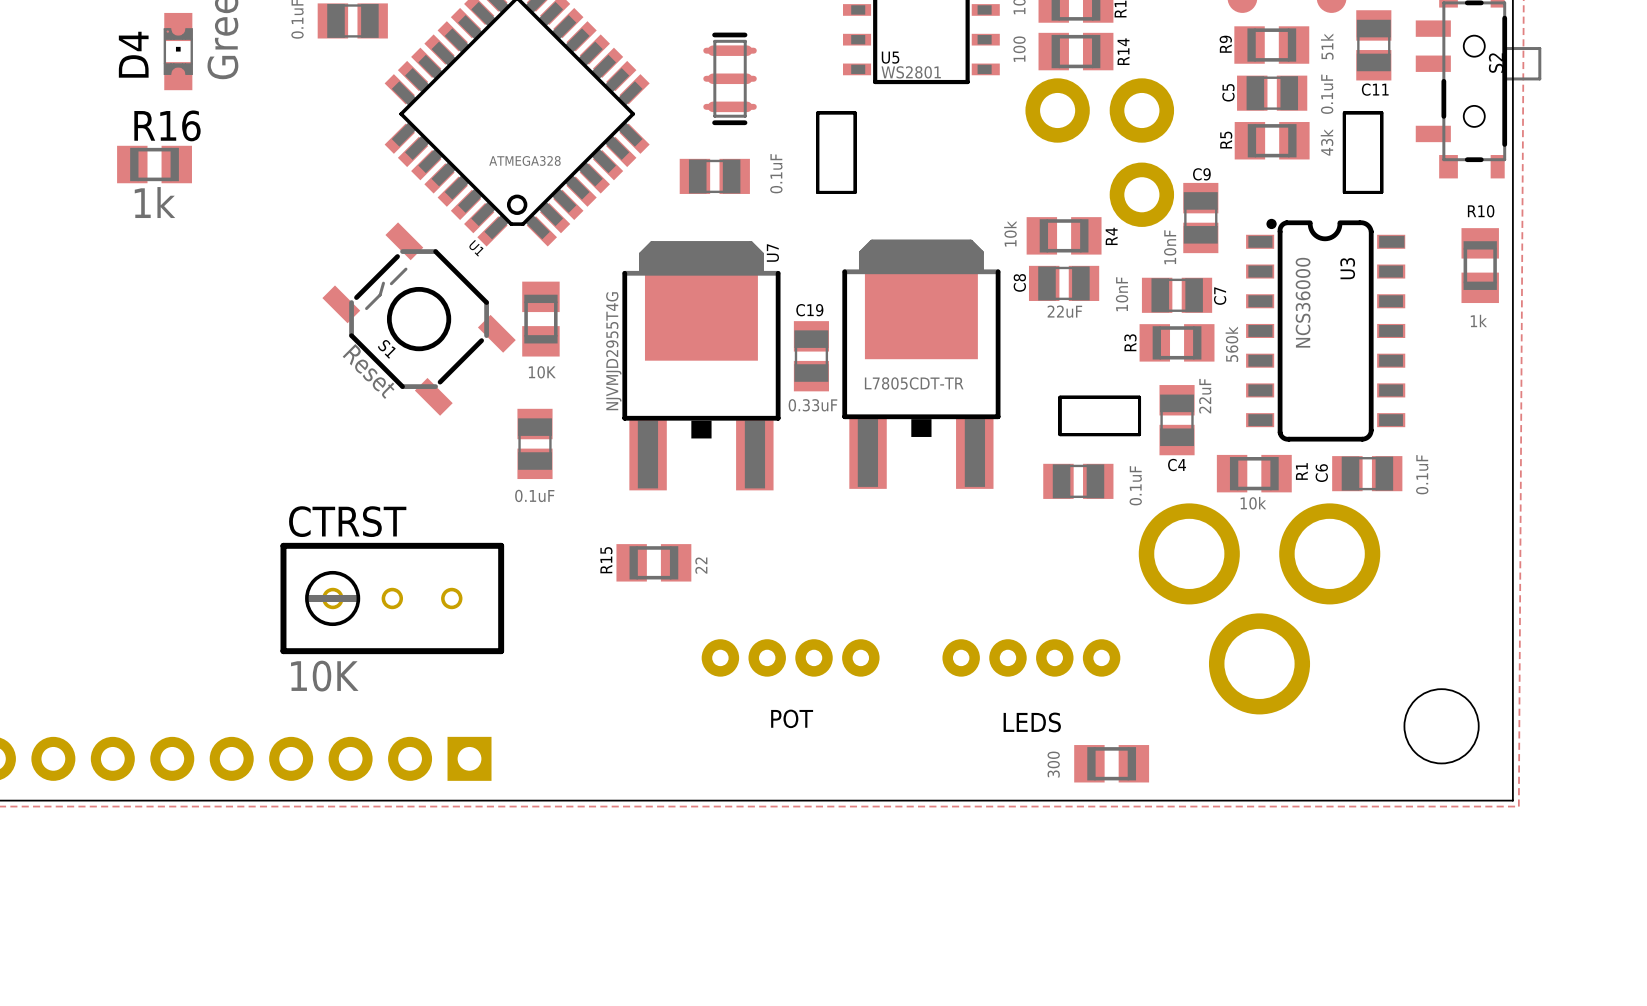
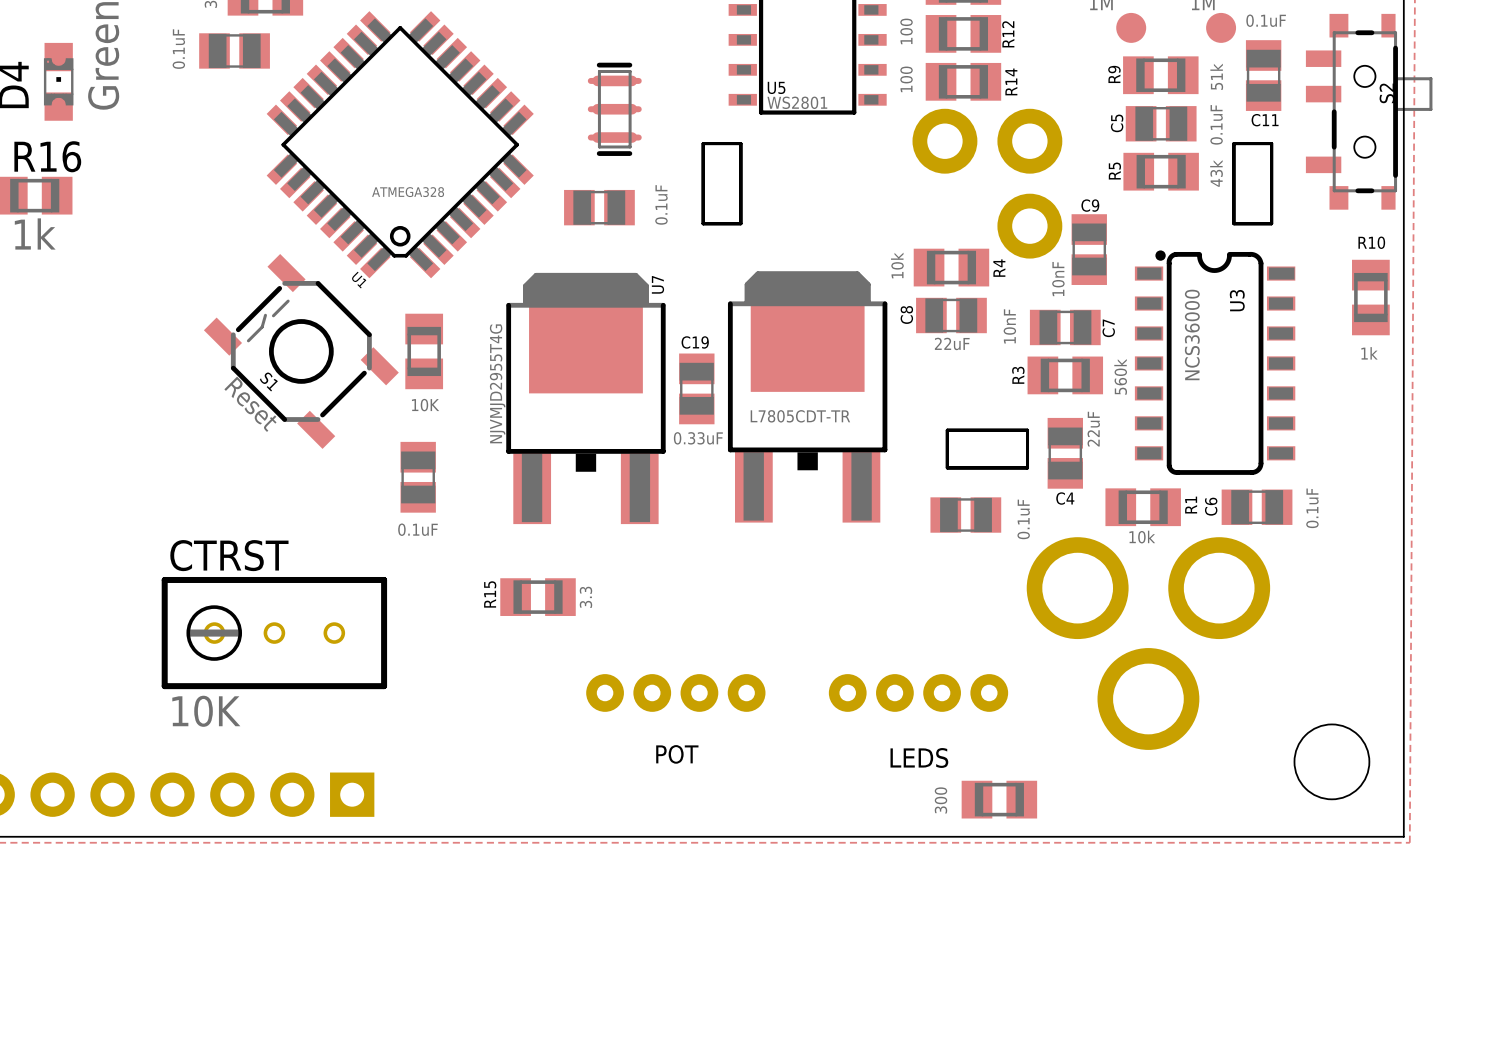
R15 value: 22 (701, 565) -> 3.3 (585, 597)

